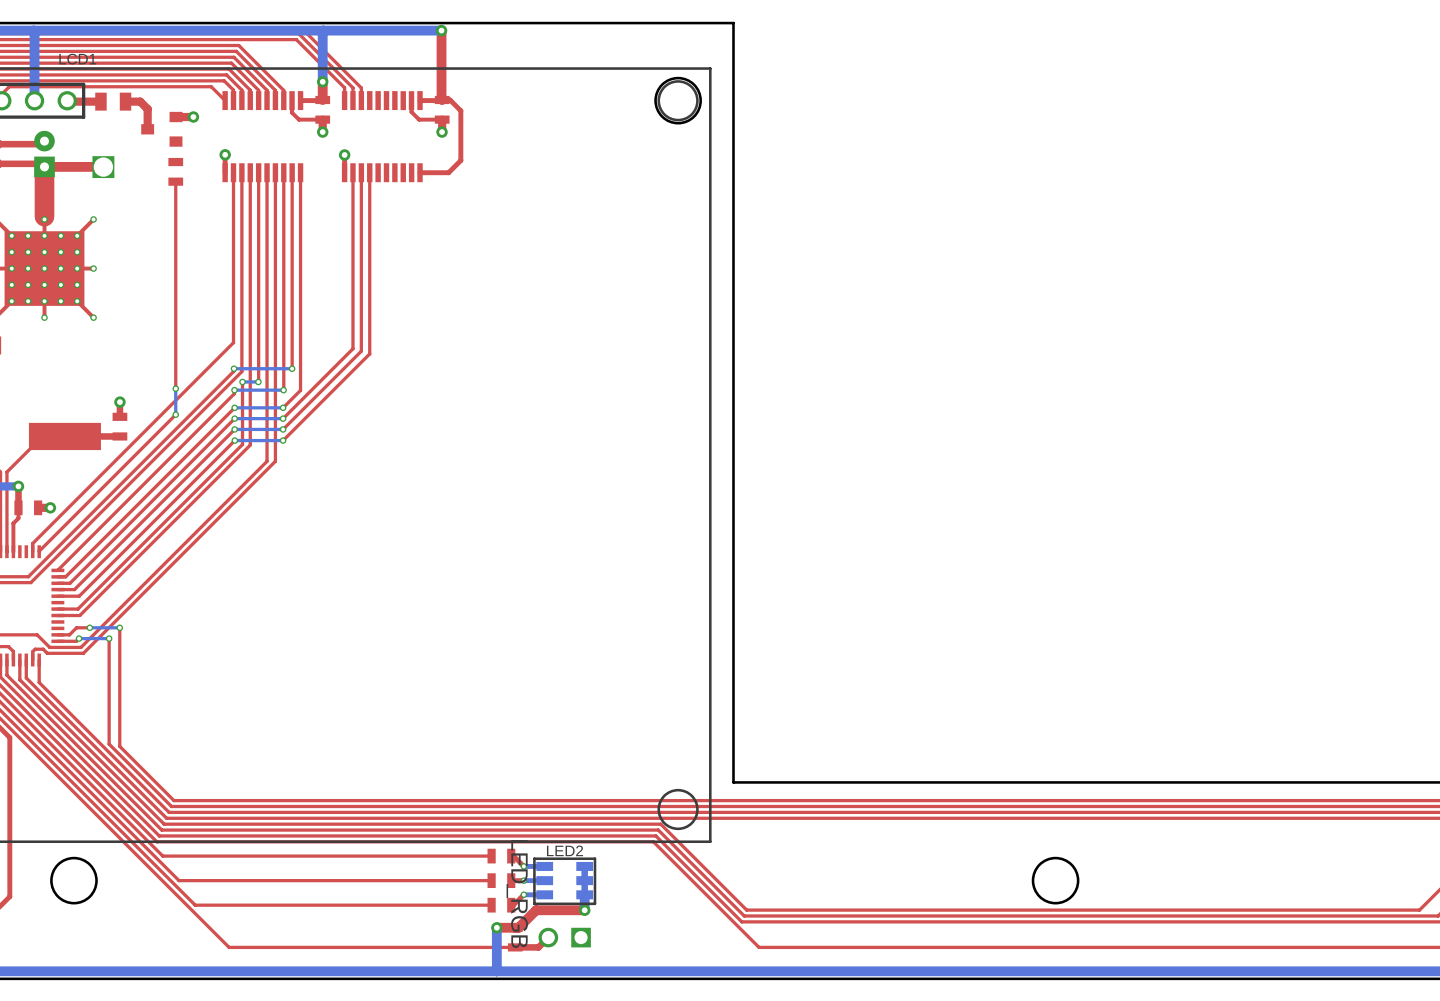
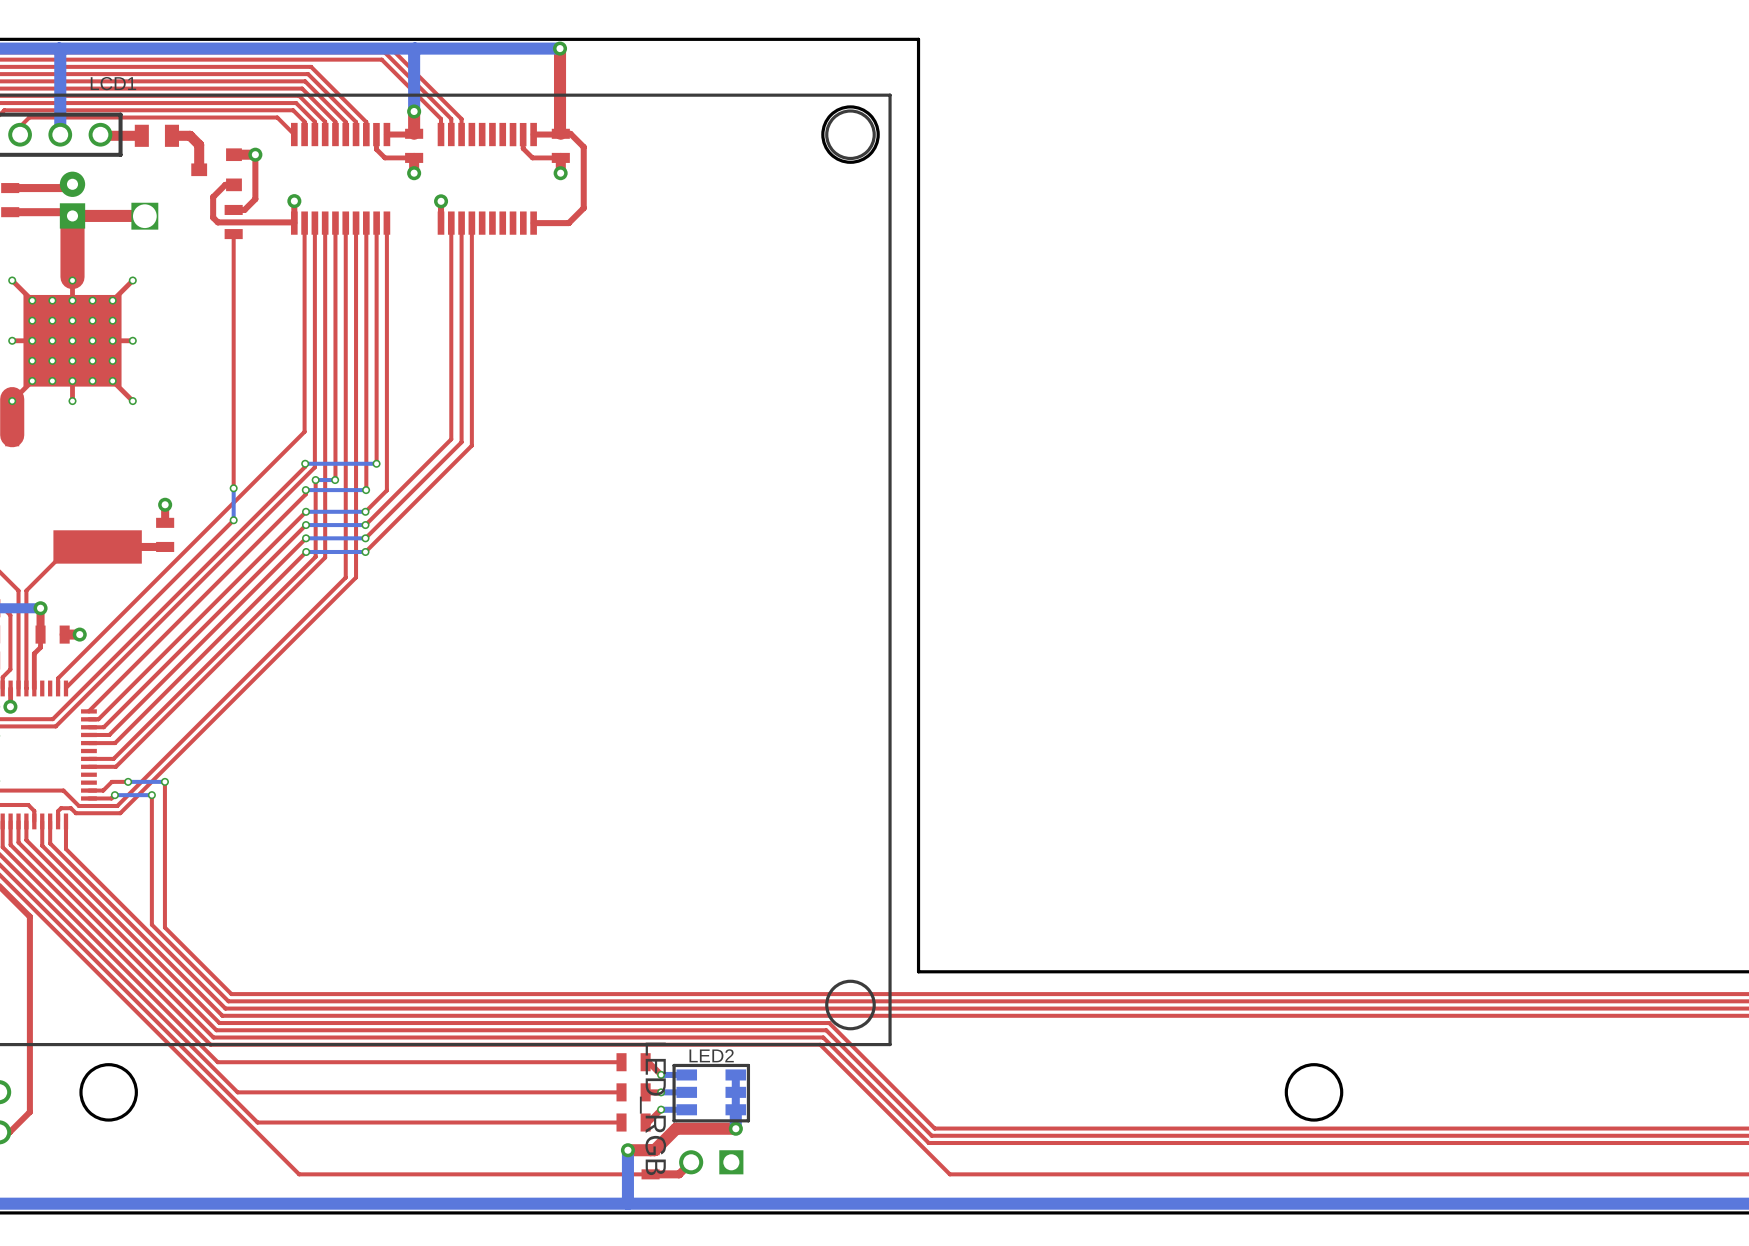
top track: none -> (255, 154) (255, 199) (244, 209) (233, 209)
top track: none -> (233, 184) (225, 184) (213, 197) (213, 217) (217, 222) (294, 223)

